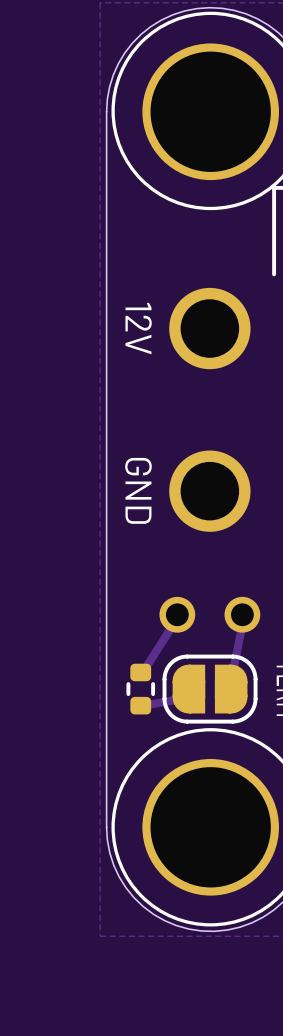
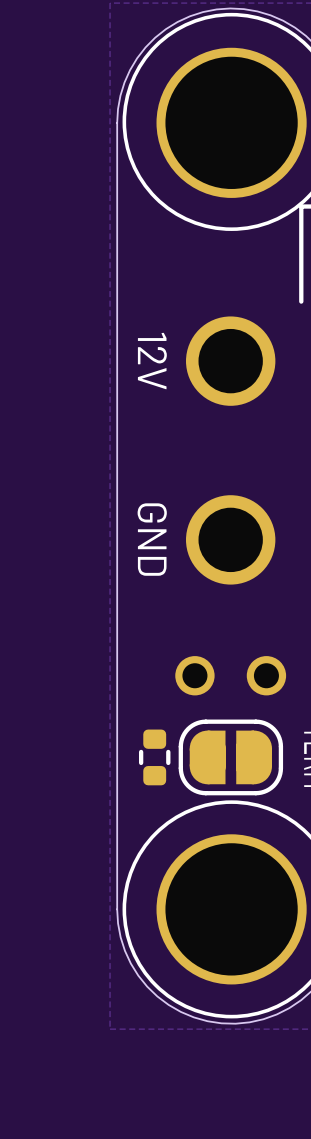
track: (242, 624) (233, 669) -> none
track: (171, 627) (145, 667) -> none
track: (181, 698) (145, 705) -> none

